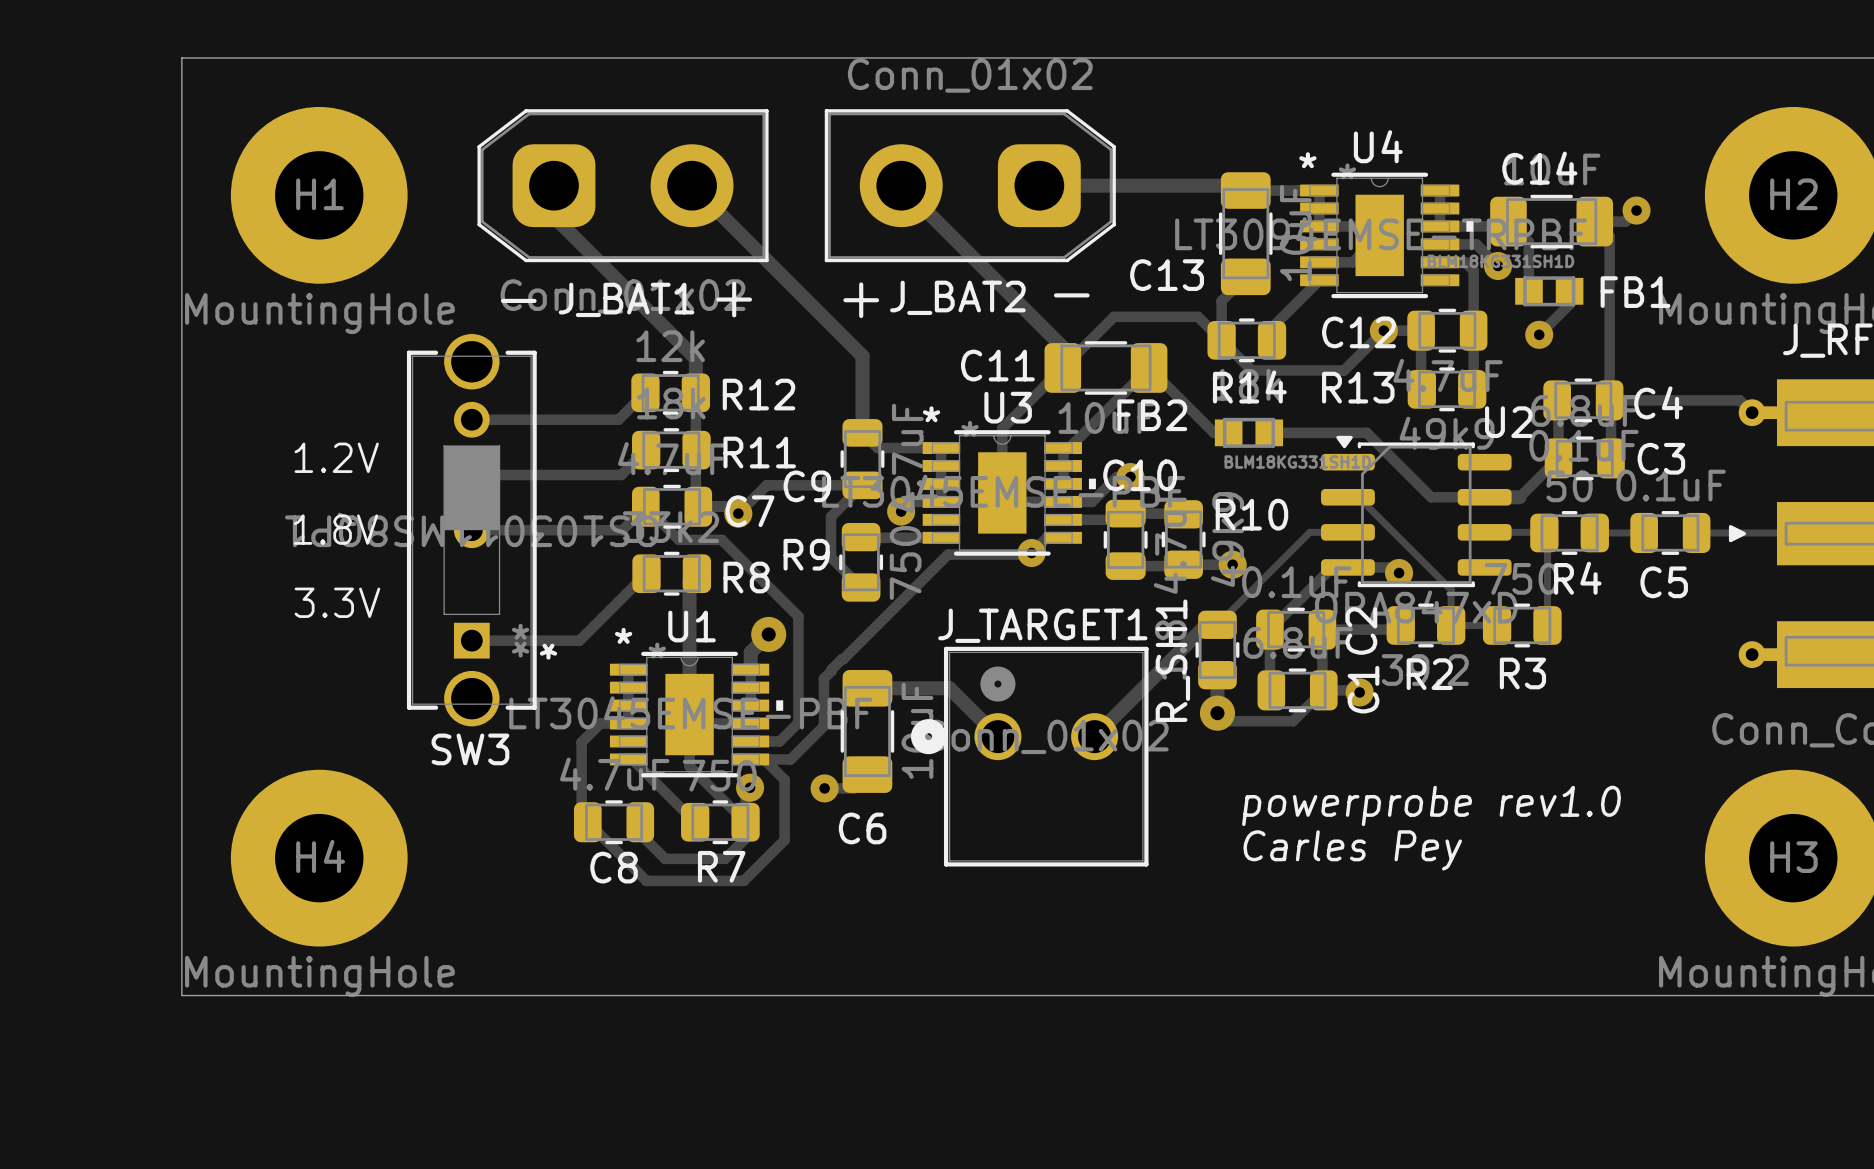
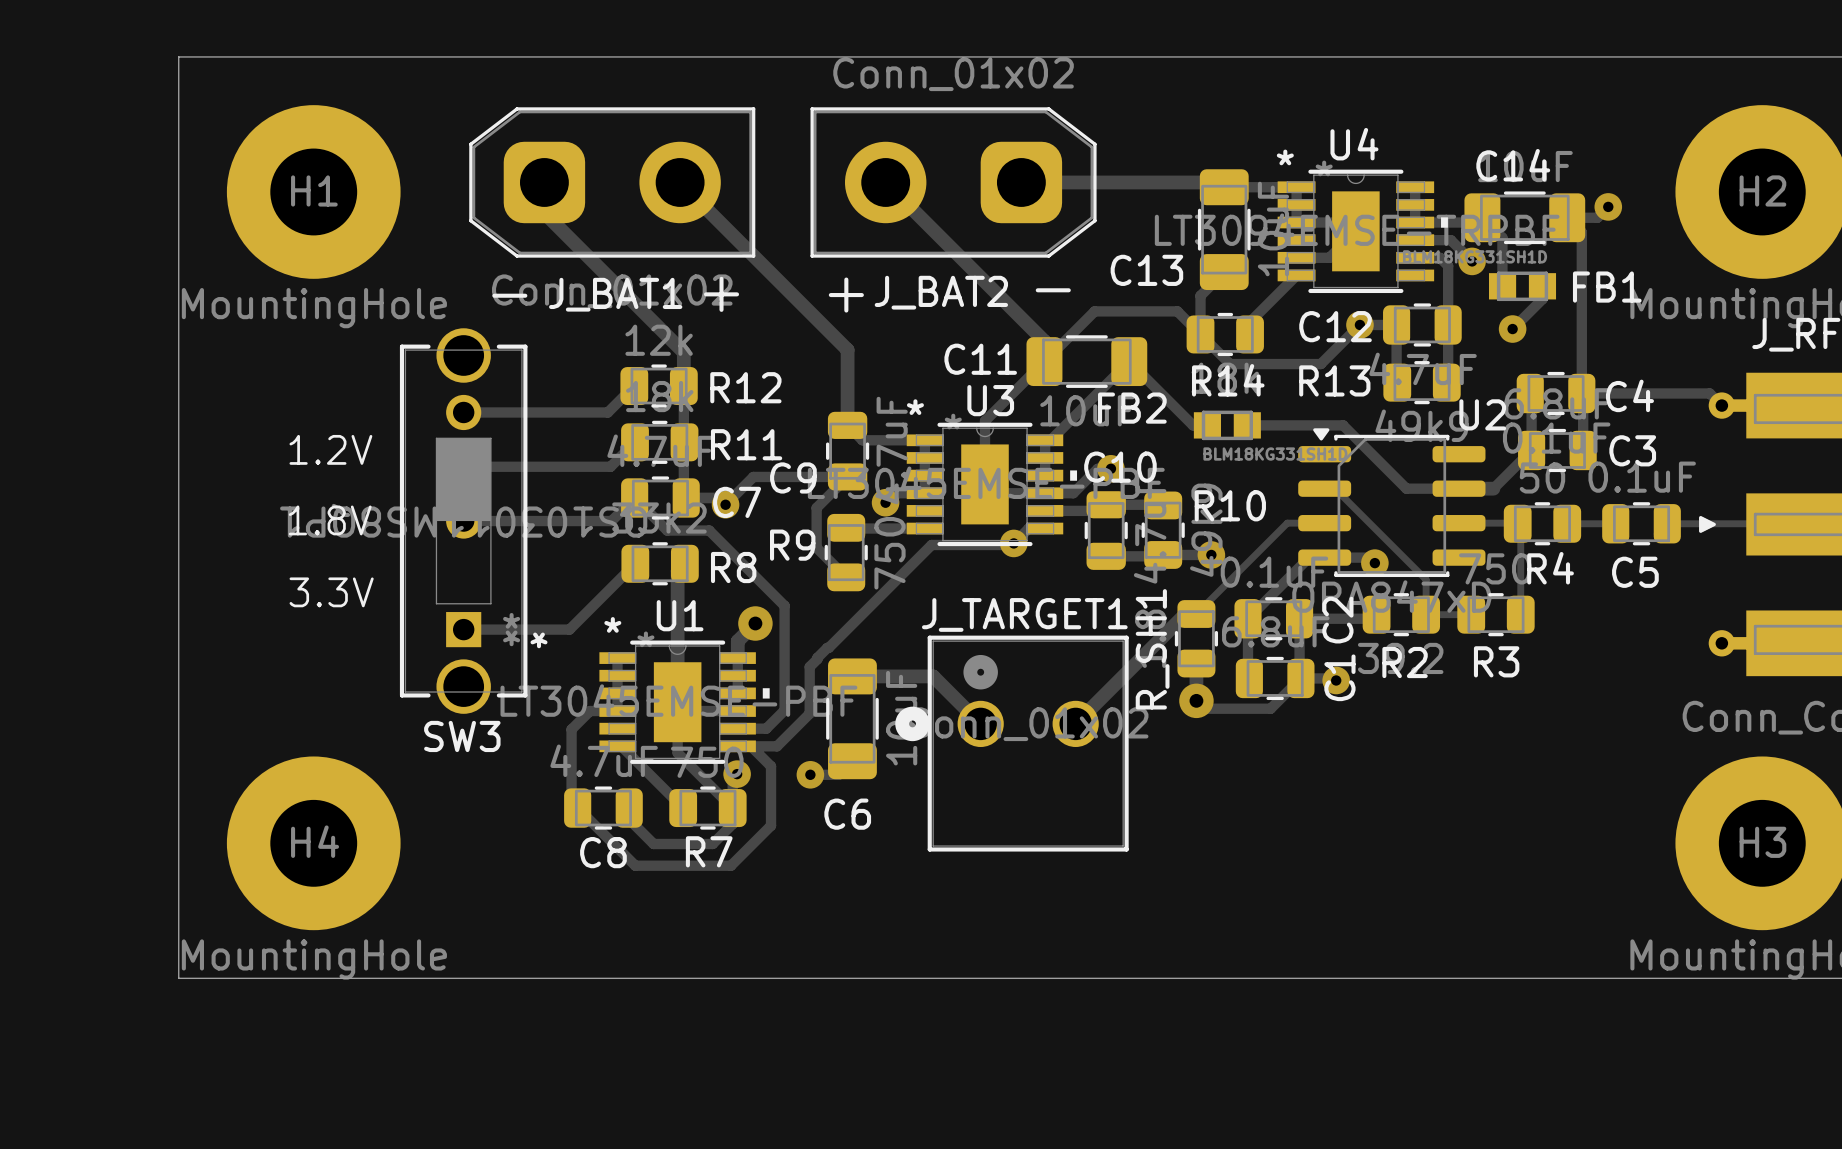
text: powerprobe rev1.0 (1431, 805) -> none
text: Carles Pey (1352, 850) -> none

